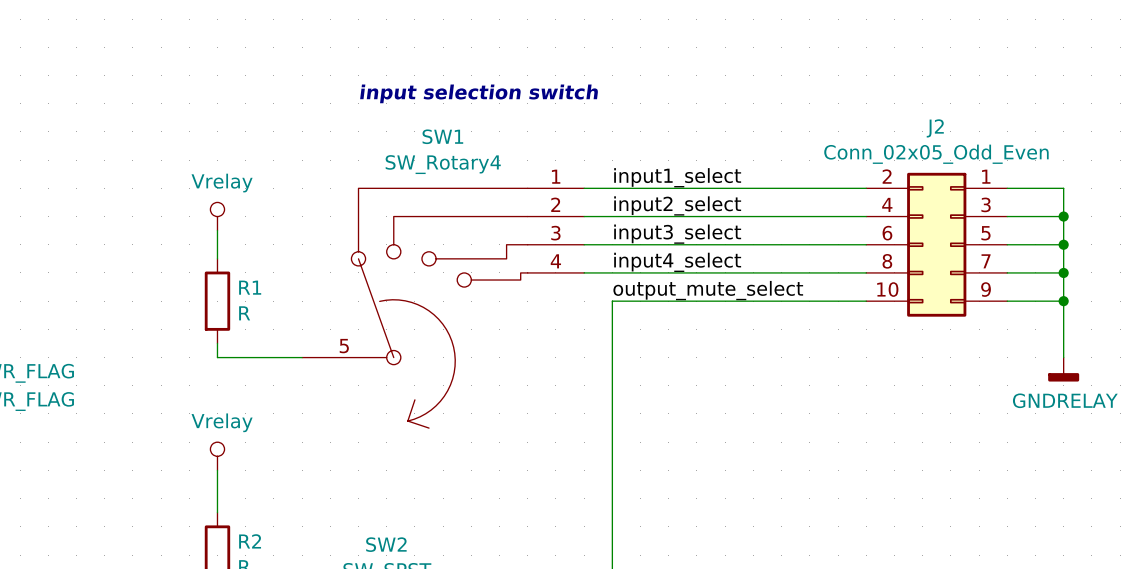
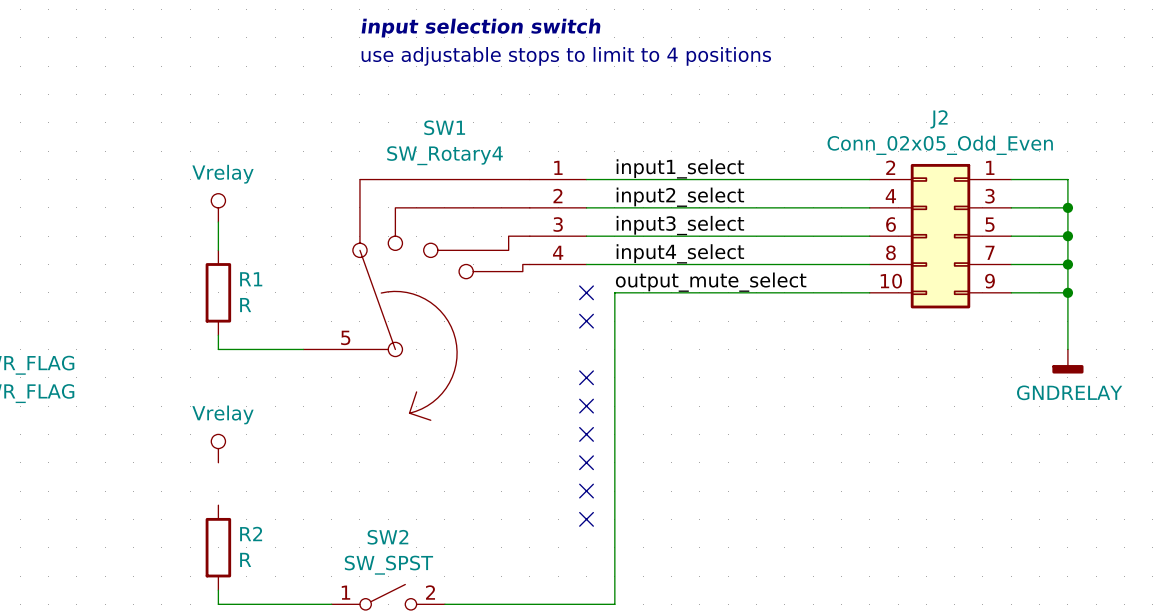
text: none -> use adjustable stops to limit to 4 positions (566, 56)
text position: input selection switch (479, 93) -> input selection switch (481, 28)
no-connect mark: none -> (586, 292)
no-connect mark: none -> (586, 321)
no-connect mark: none -> (586, 377)
no-connect mark: none -> (586, 406)
no-connect mark: none -> (586, 434)
wire: (217, 470) (217, 512) -> none
no-connect mark: none -> (586, 462)
no-connect mark: none -> (586, 491)
no-connect mark: none -> (586, 519)

